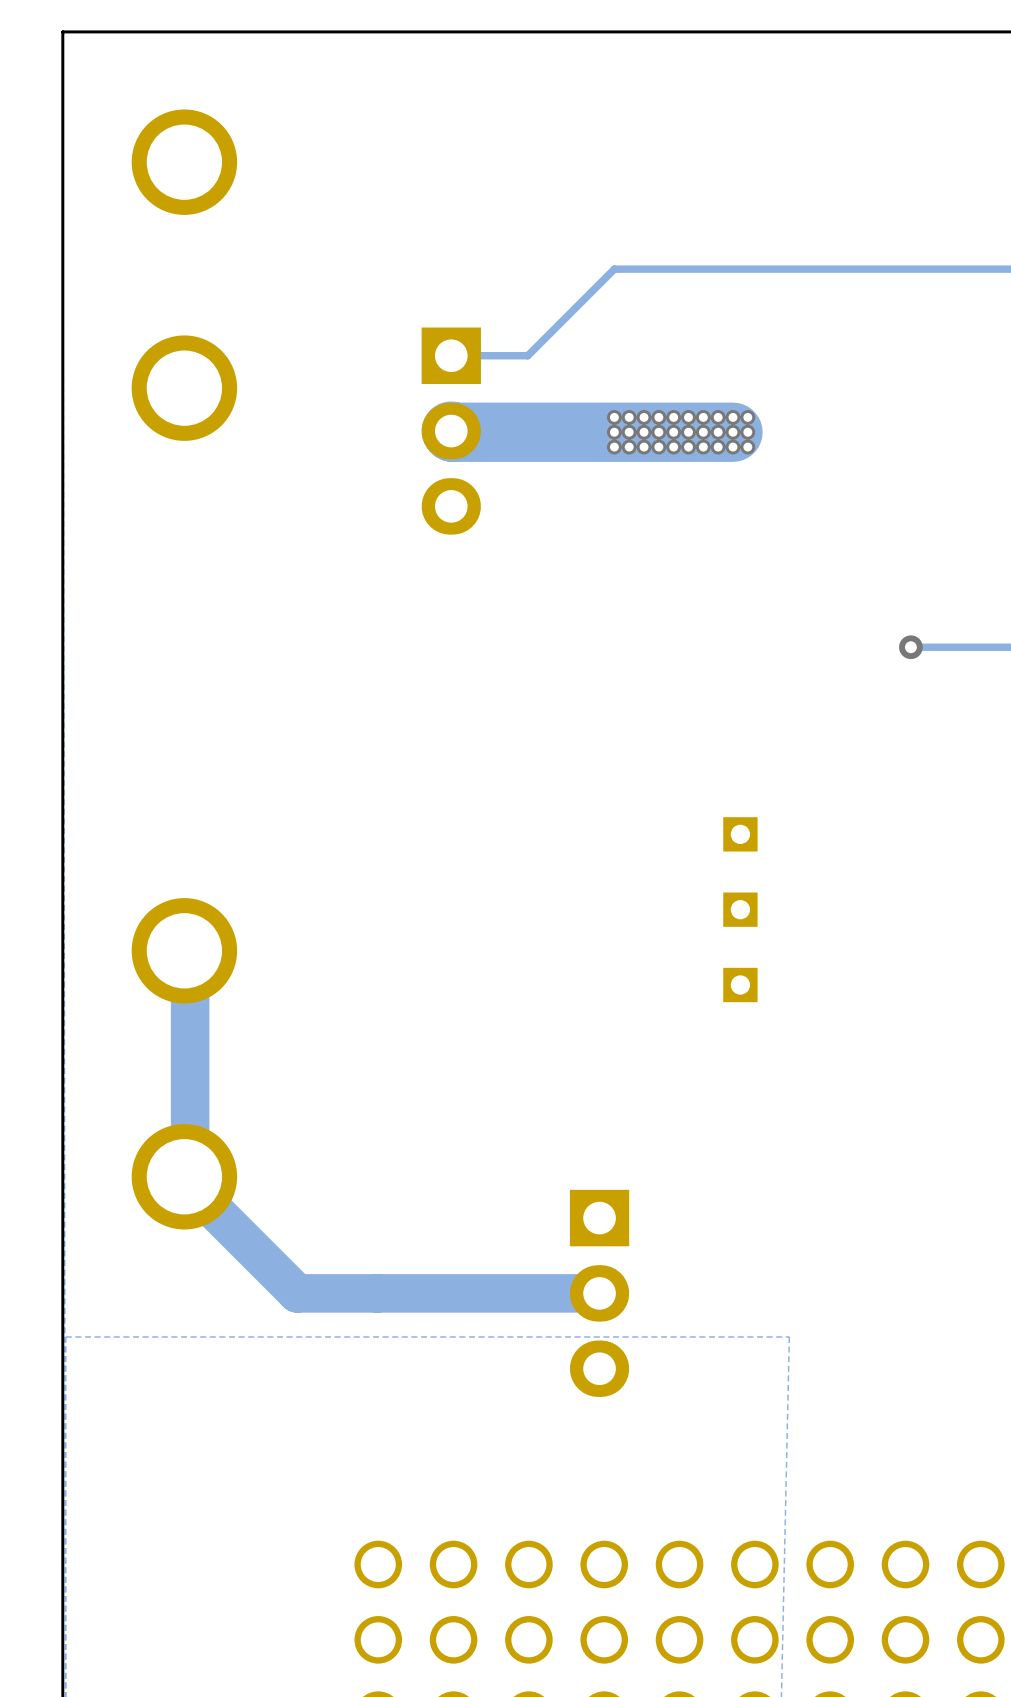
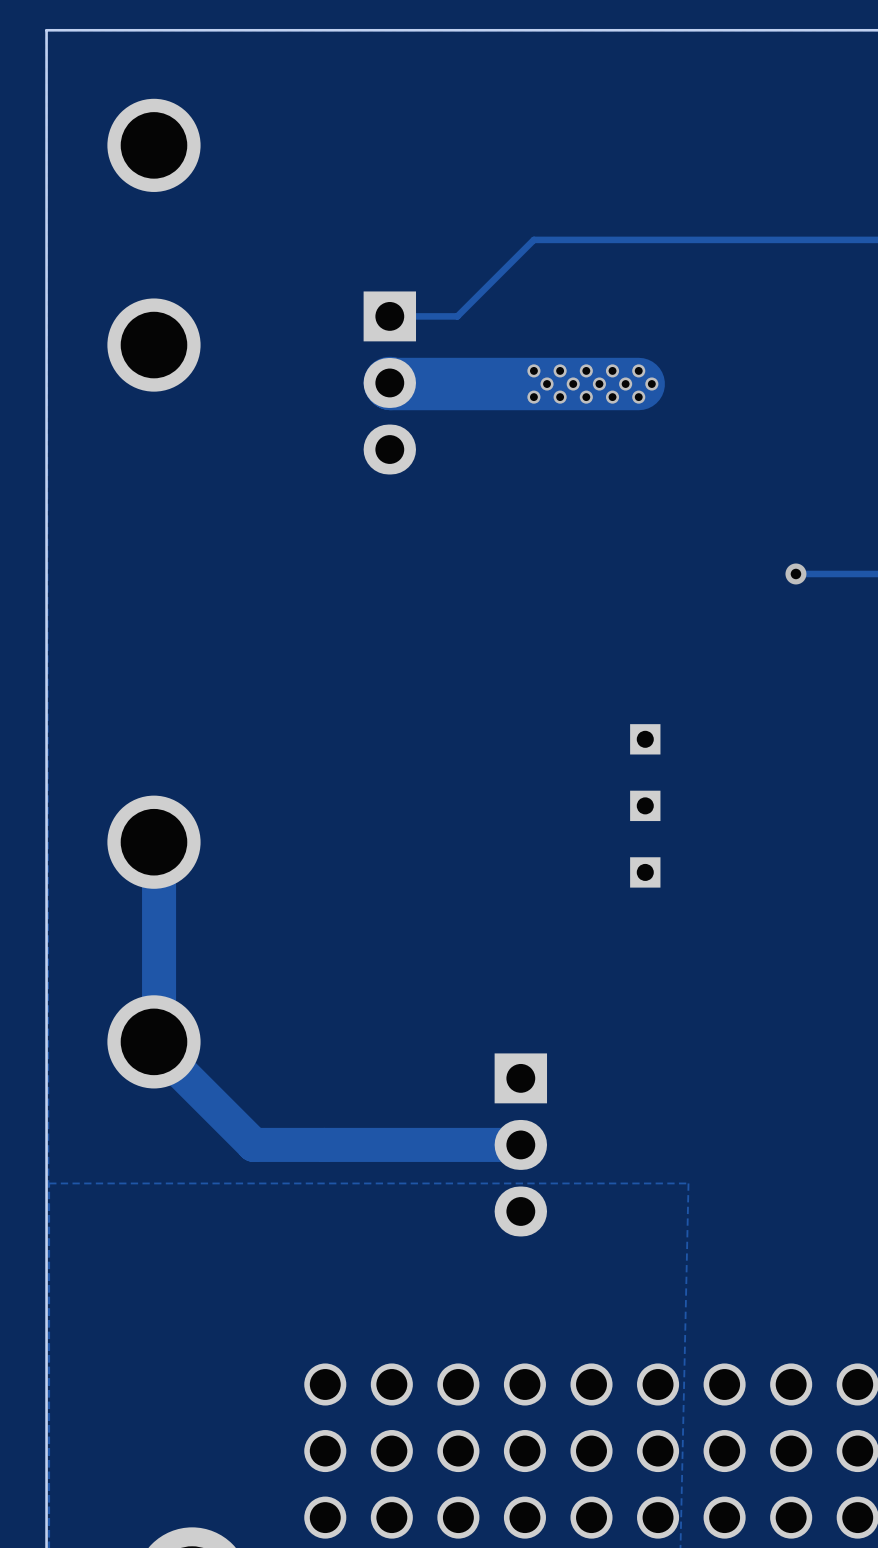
via: (629, 417) -> none
via: (658, 417) -> none
via: (688, 417) -> none
via: (718, 417) -> none
via: (747, 417) -> none
via: (614, 432) -> none
via: (644, 432) -> none
via: (673, 432) -> none
via: (703, 432) -> none
via: (733, 432) -> none
via: (629, 447) -> none
via: (658, 447) -> none
via: (688, 447) -> none
via: (718, 447) -> none
via: (747, 447) -> none

